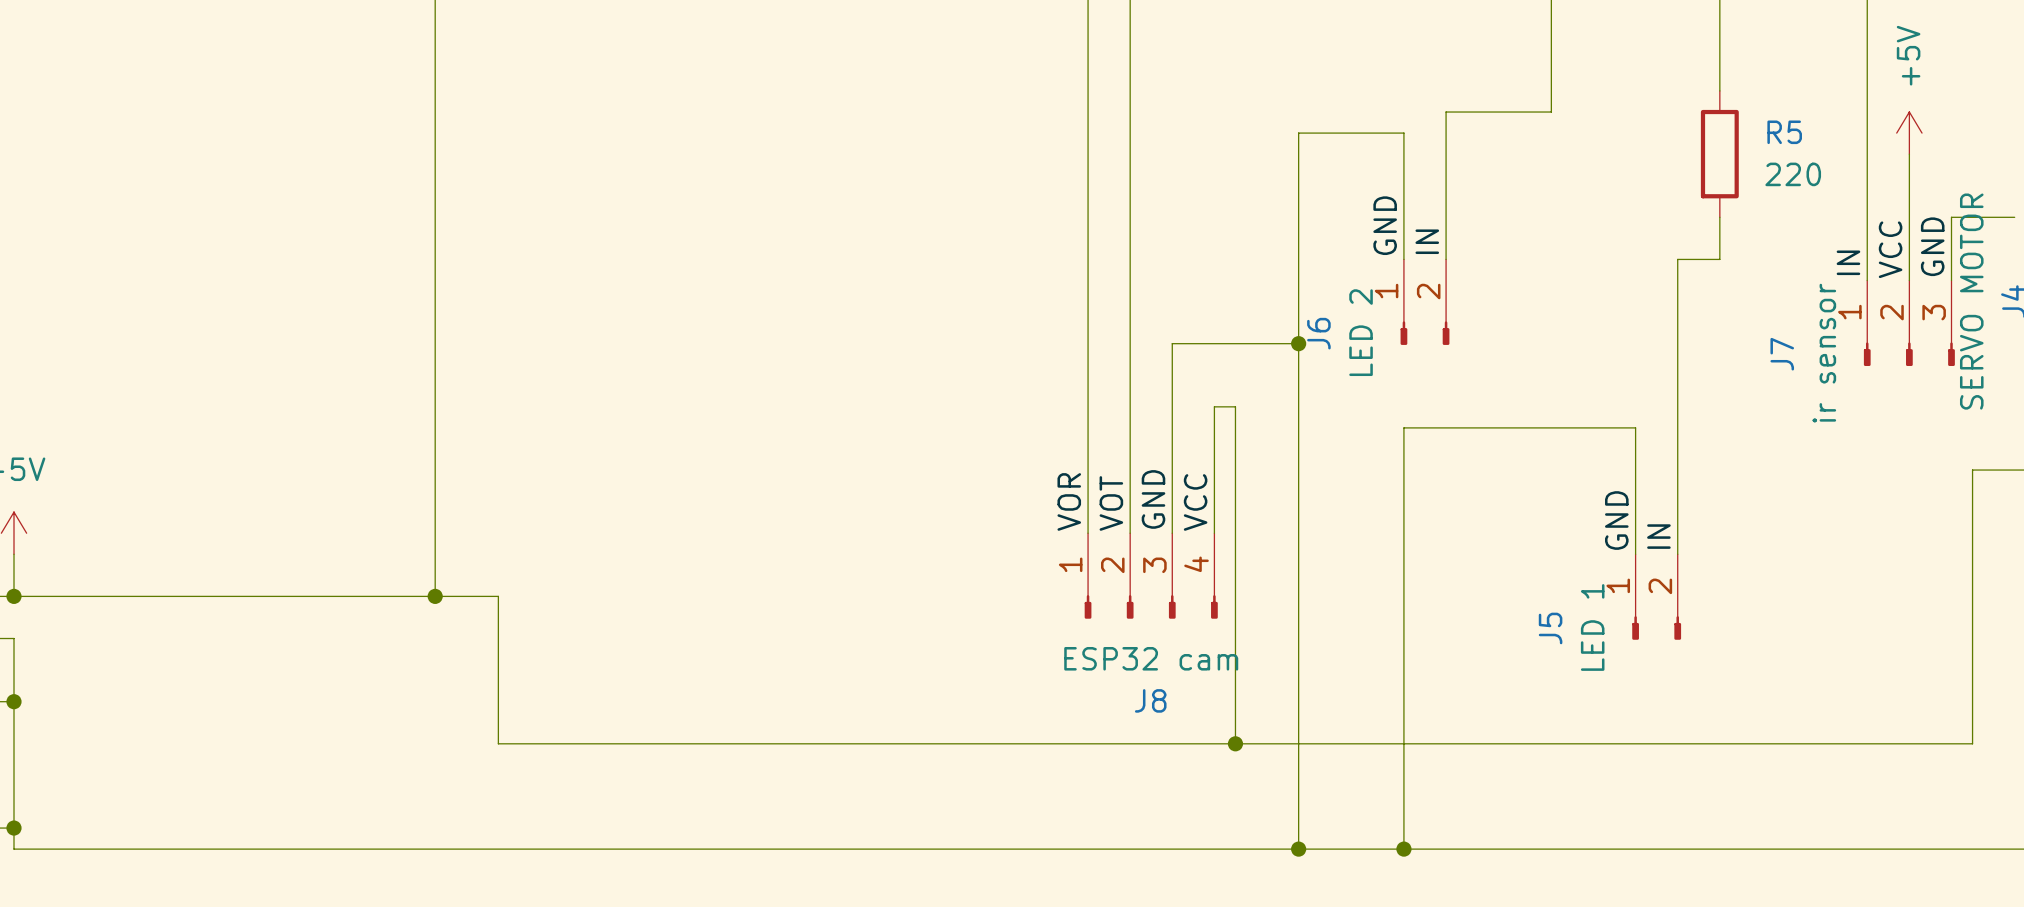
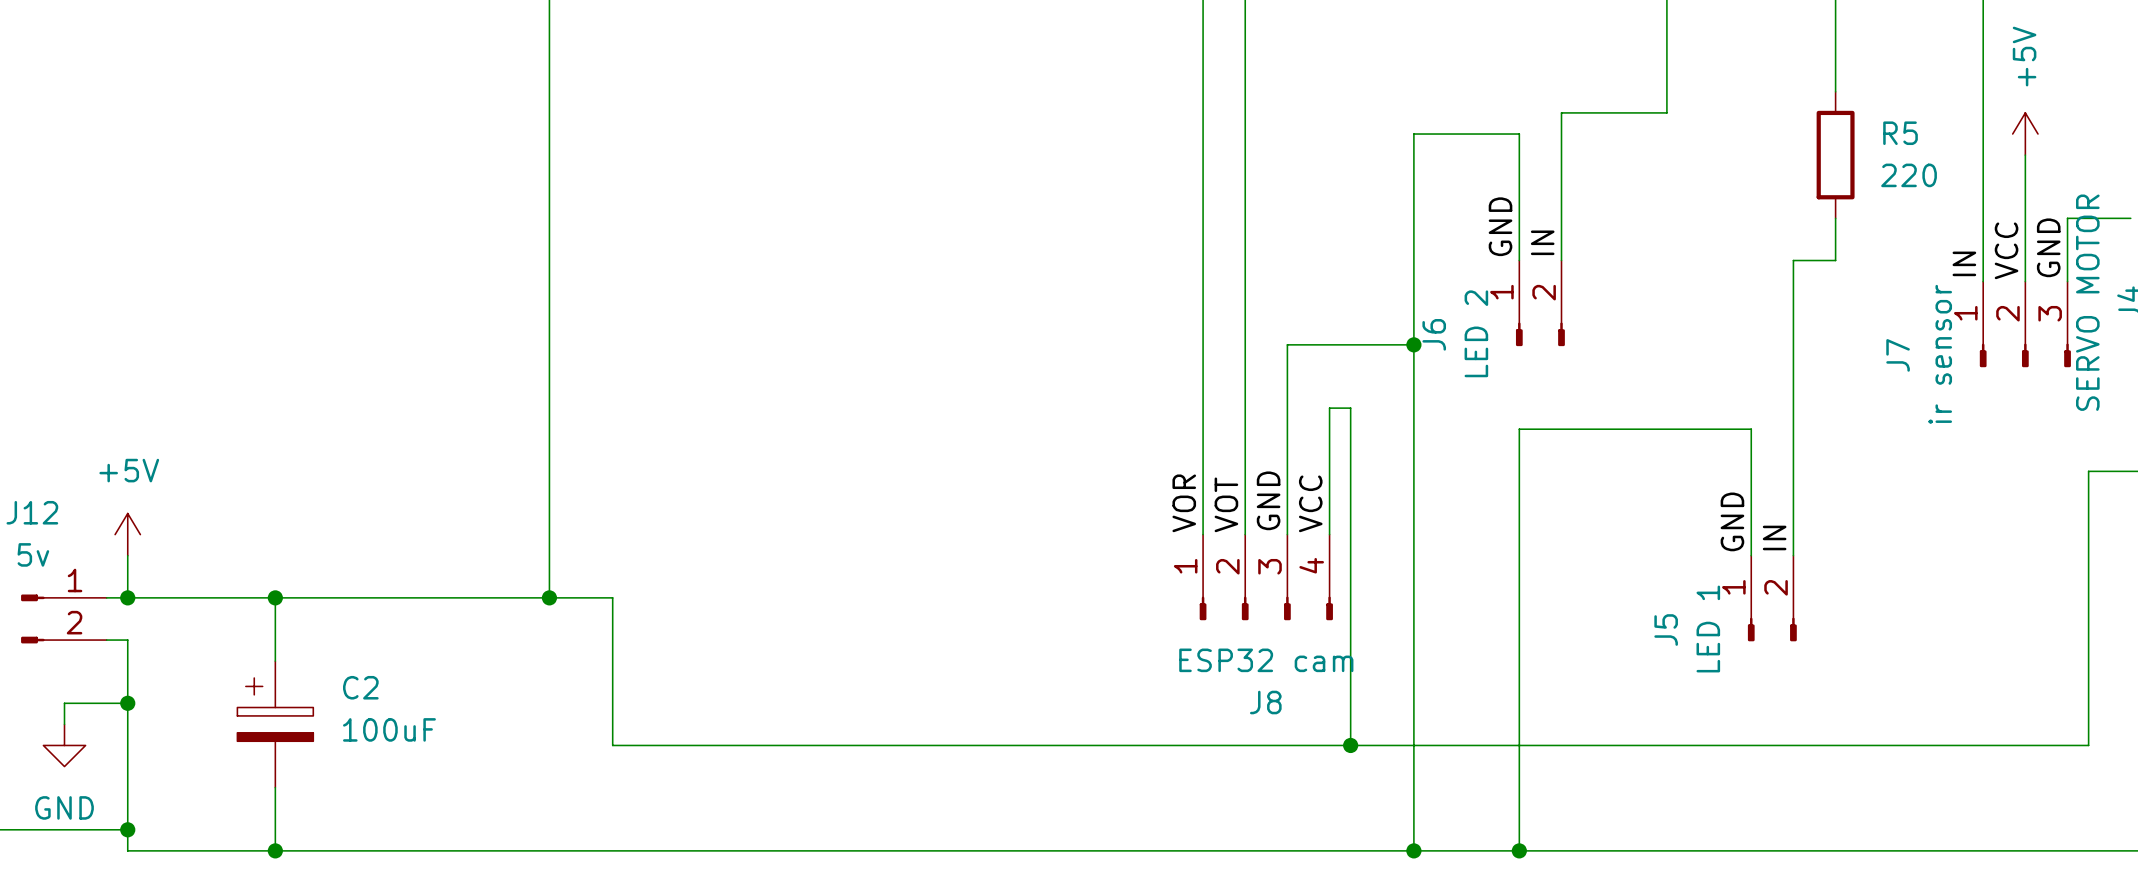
wire: none -> (275, 597) (275, 661)
junction: none -> (275, 597)
C2: none -> 100uF (275, 724)
wire: none -> (275, 787) (275, 850)
junction: none -> (275, 850)

